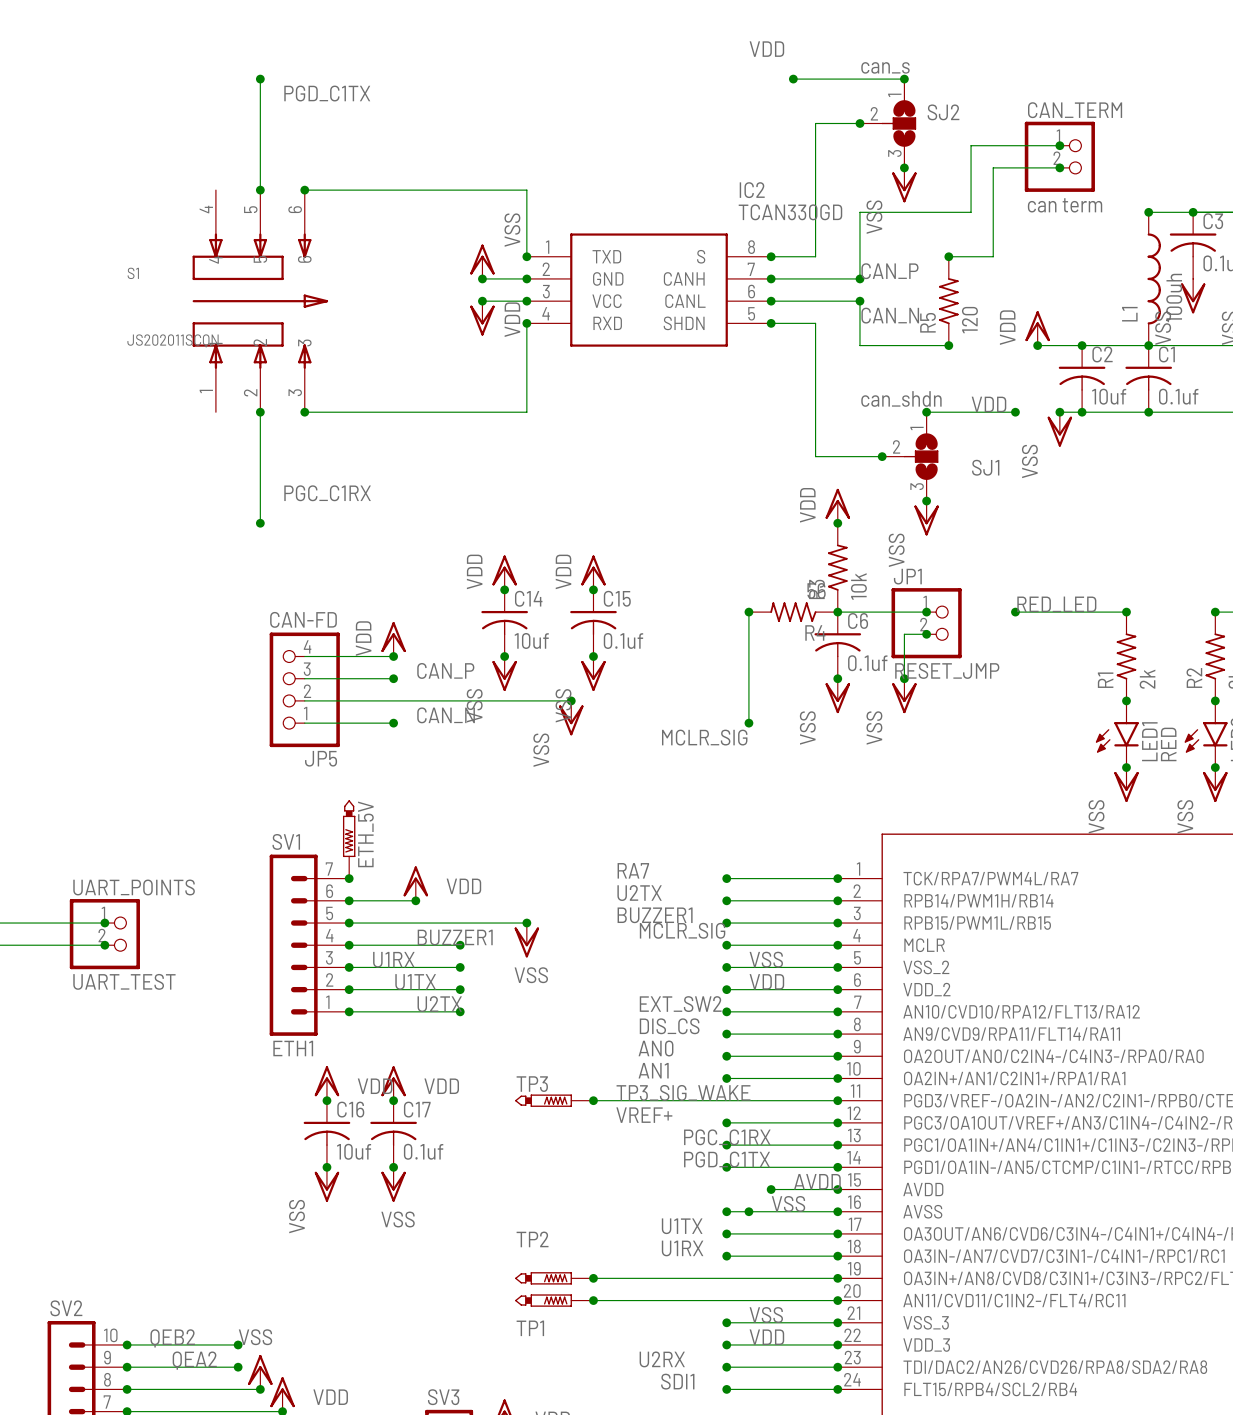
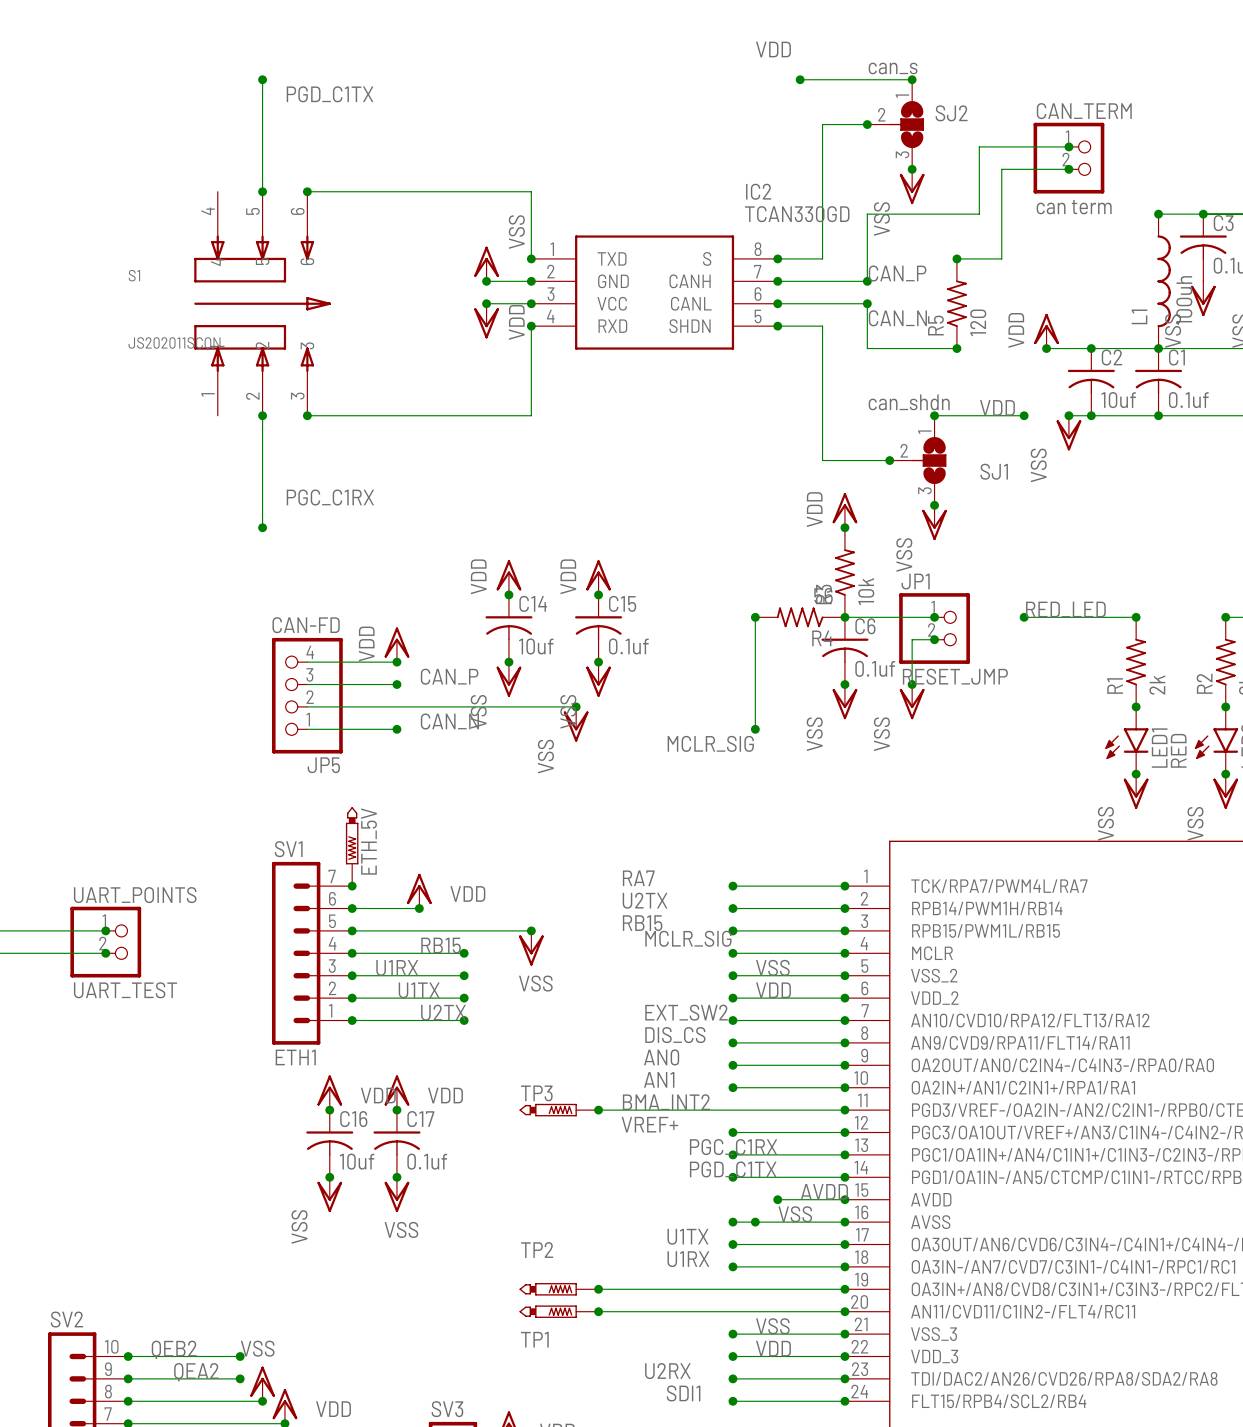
label: BUZZER1 (655, 915) -> RB15 (642, 923)
label: BUZZER1 (455, 937) -> RB15 (441, 945)
label: TP3_SIG_WAKE (683, 1092) -> BMA_INT2 (666, 1102)

